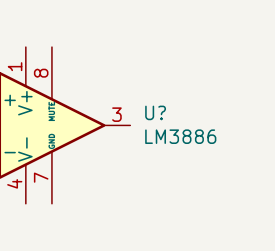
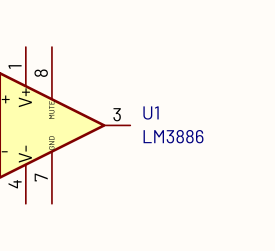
U? name: U? (155, 112) -> U1 (151, 112)

